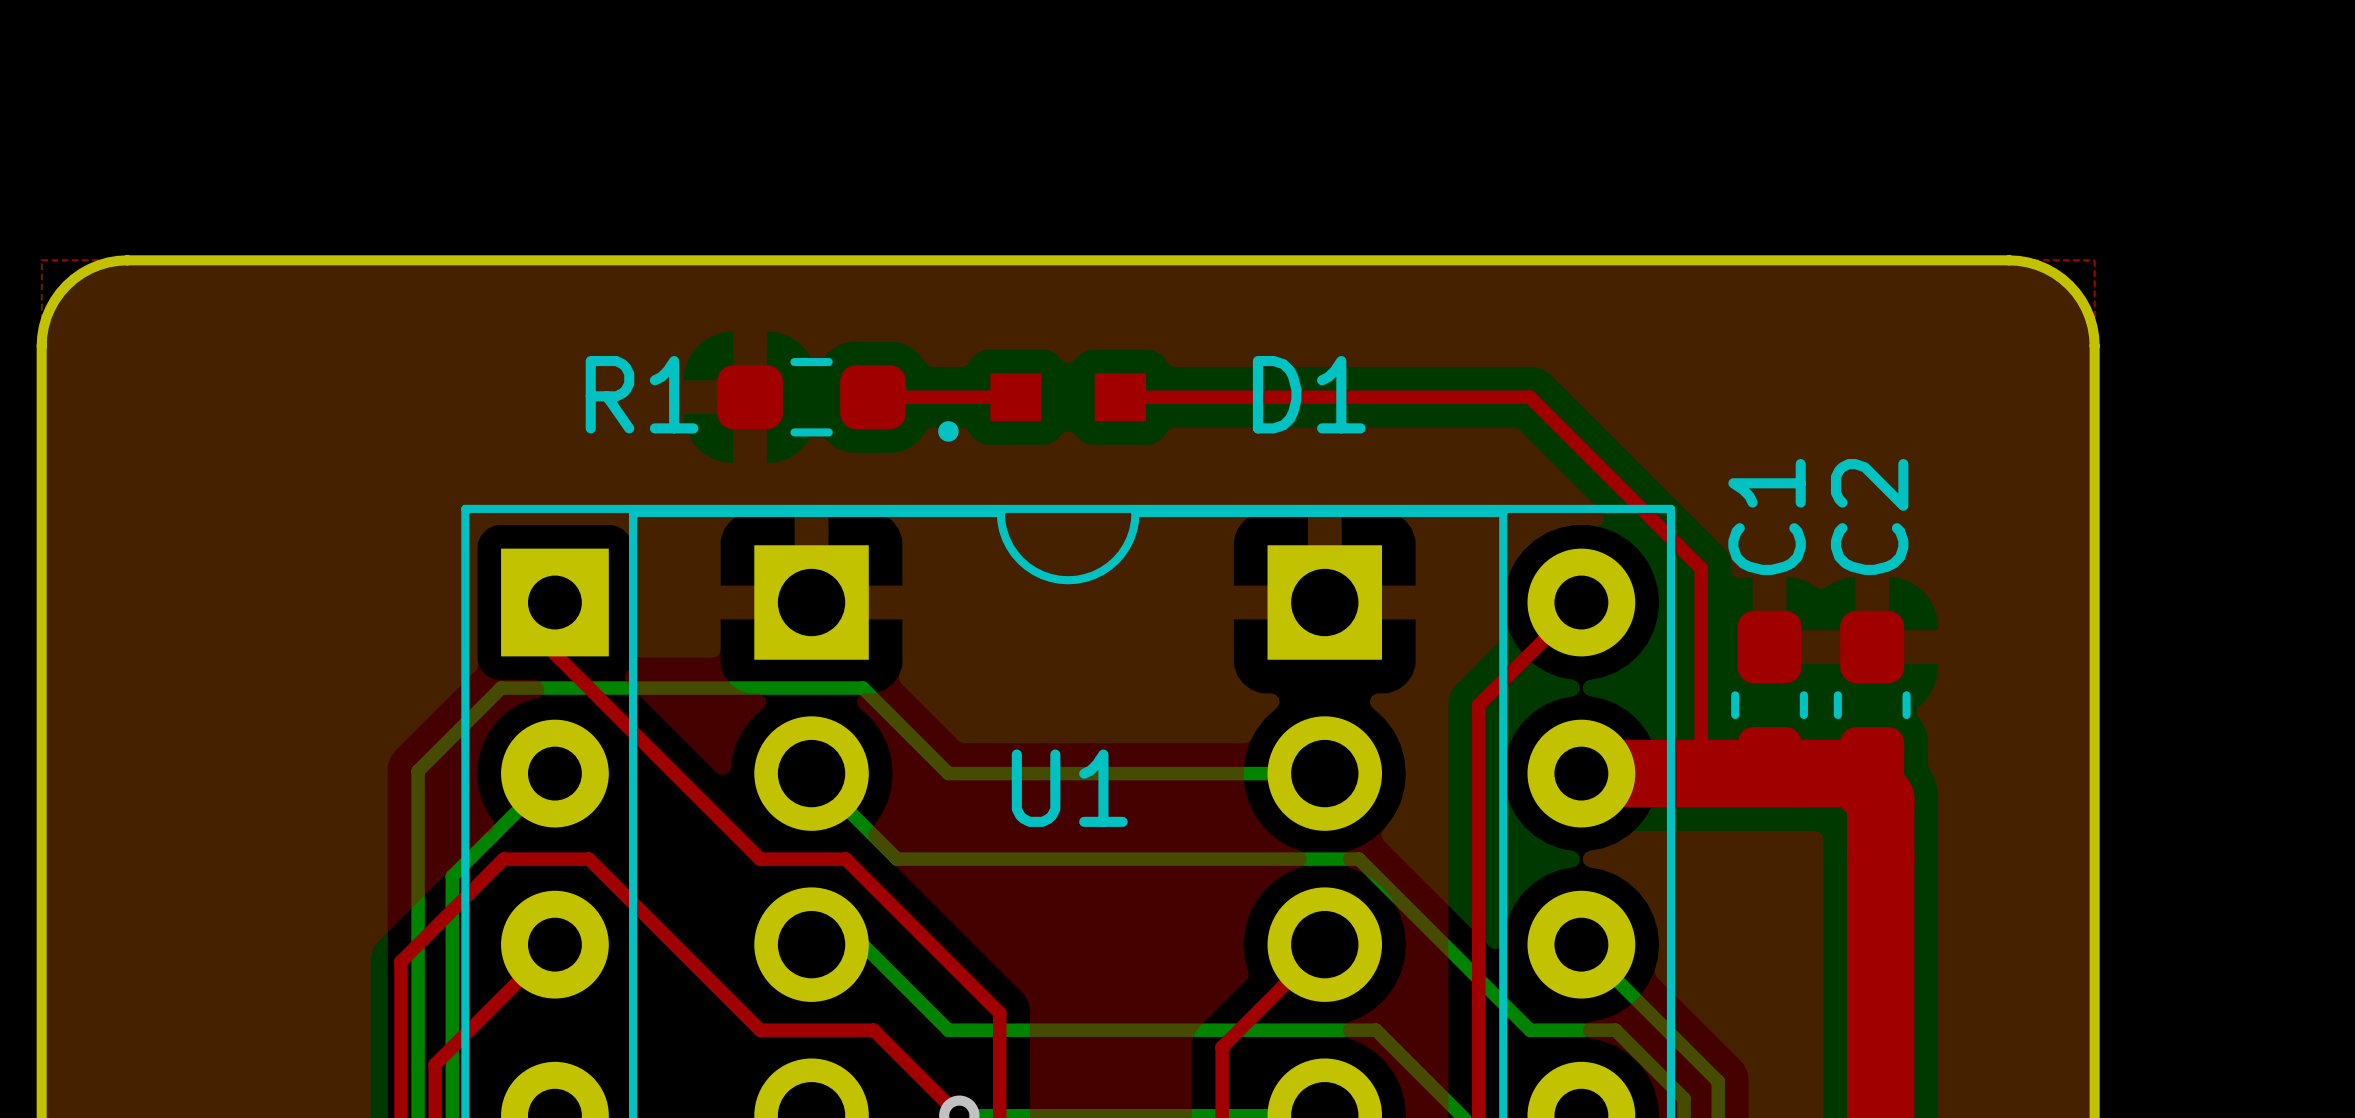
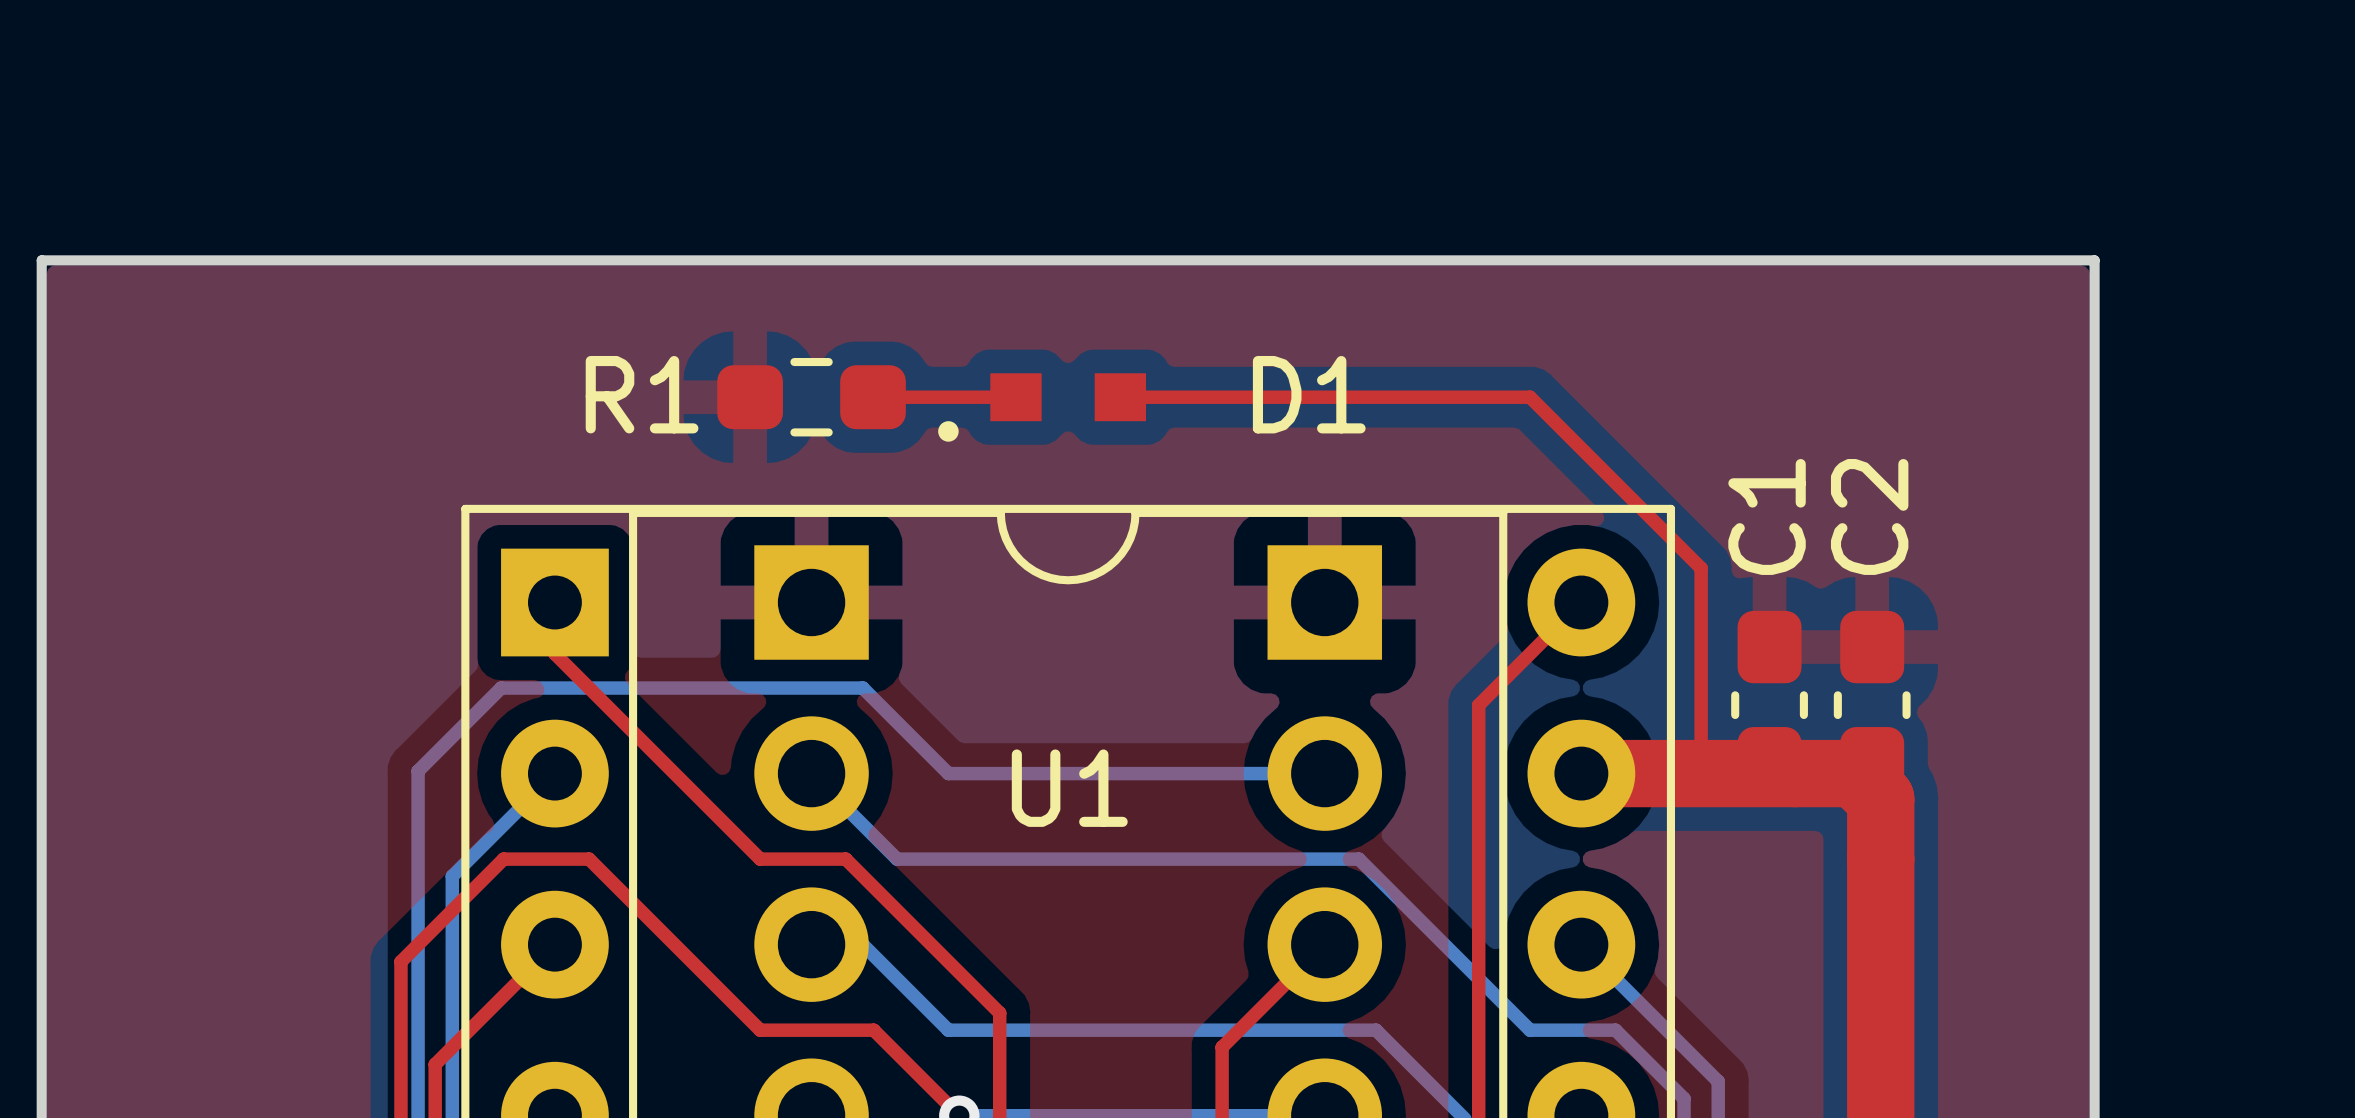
board edge: (127, 260) (99, 265) (81, 273) (66, 285) (50, 308) (43, 326) (41, 345) -> (127, 260) (41, 260) (41, 345)
board edge: (2009, 260) (2028, 262) (2046, 268) (2069, 285) (2086, 308) (2092, 326) (2094, 345) -> (2009, 260) (2094, 260) (2094, 345)

